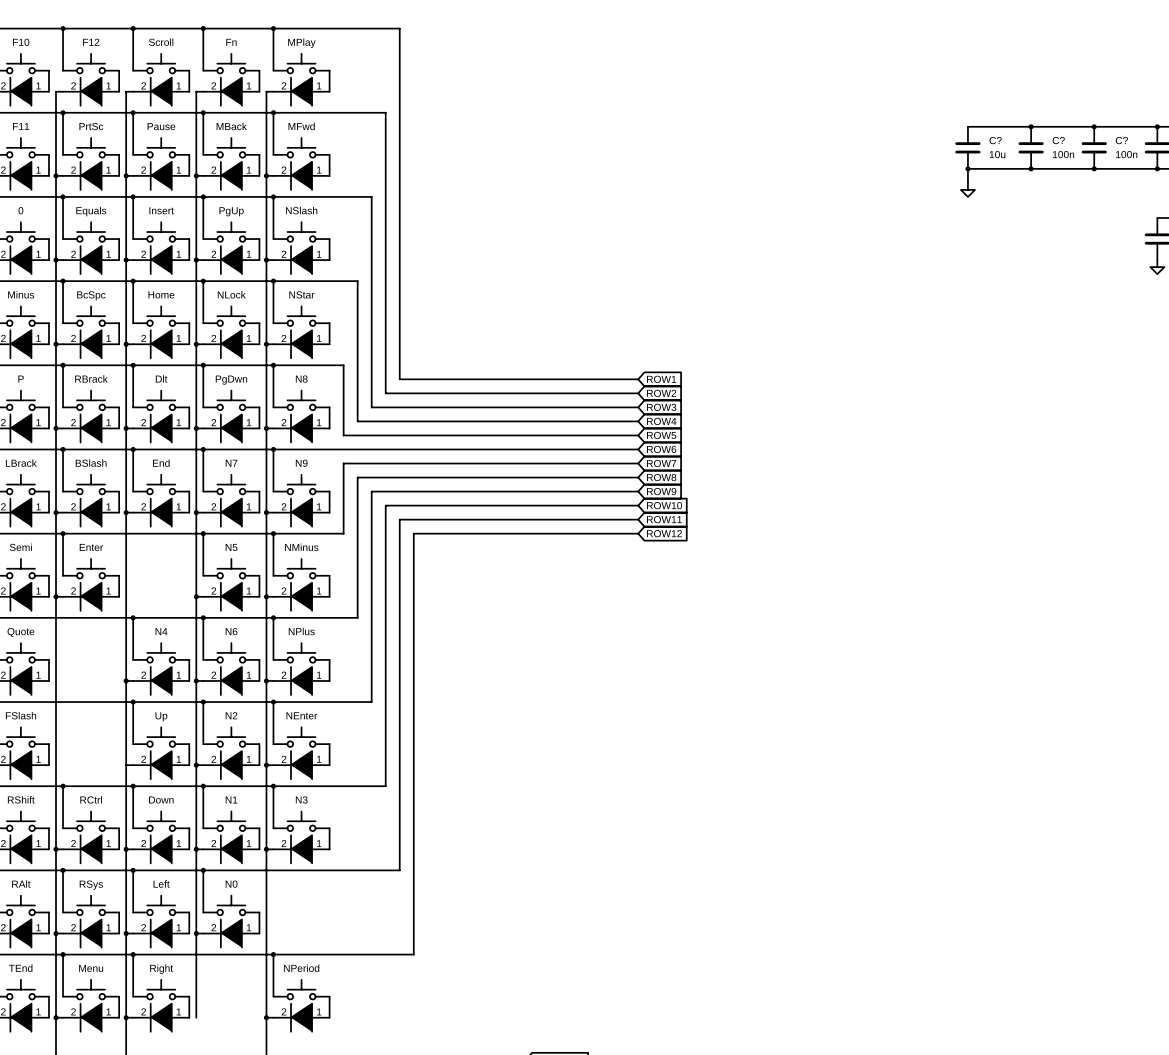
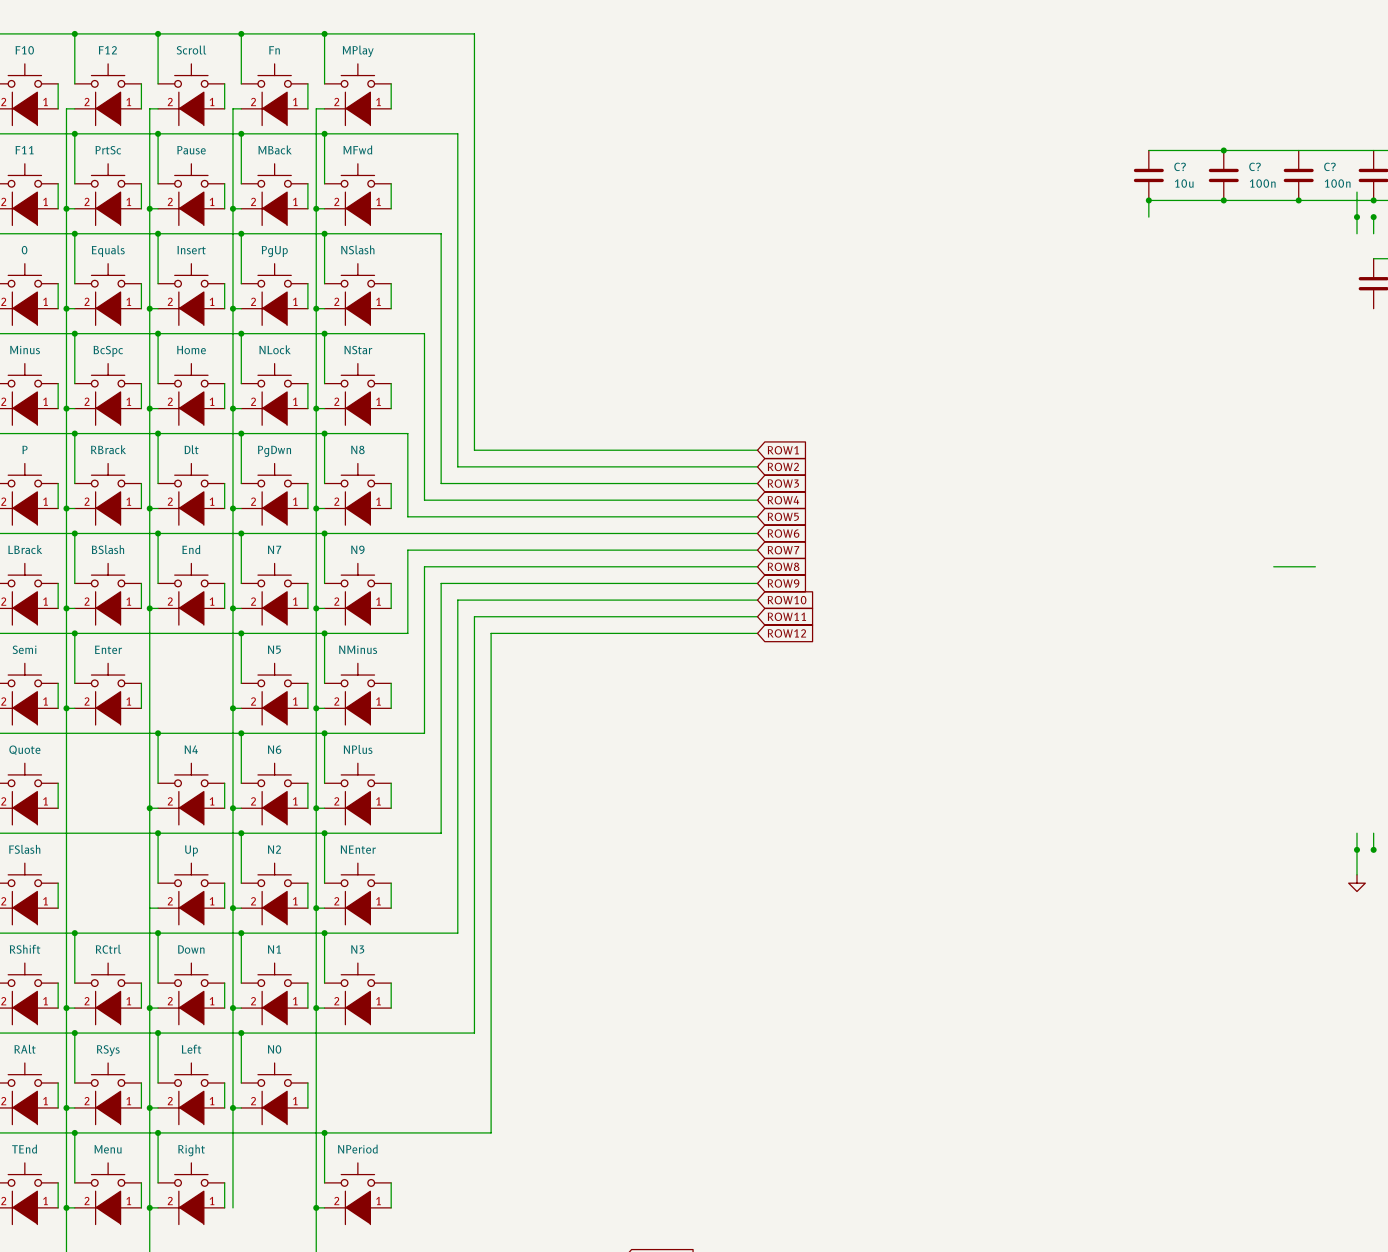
junction: (1094, 126) -> none
junction: (1157, 126) -> none
wire: none -> (1356, 192) (1356, 233)
junction: none -> (1356, 217)
wire: none -> (1373, 217) (1373, 233)
junction: none -> (1373, 217)
power symbol: (967, 189) -> none
power symbol: (1157, 267) -> none
wire: none -> (1273, 566) (1315, 566)
wire: none -> (1356, 833) (1356, 874)
wire: none -> (1373, 833) (1373, 849)
junction: none -> (1356, 849)
junction: none -> (1373, 849)
power symbol: none -> (1356, 883)

